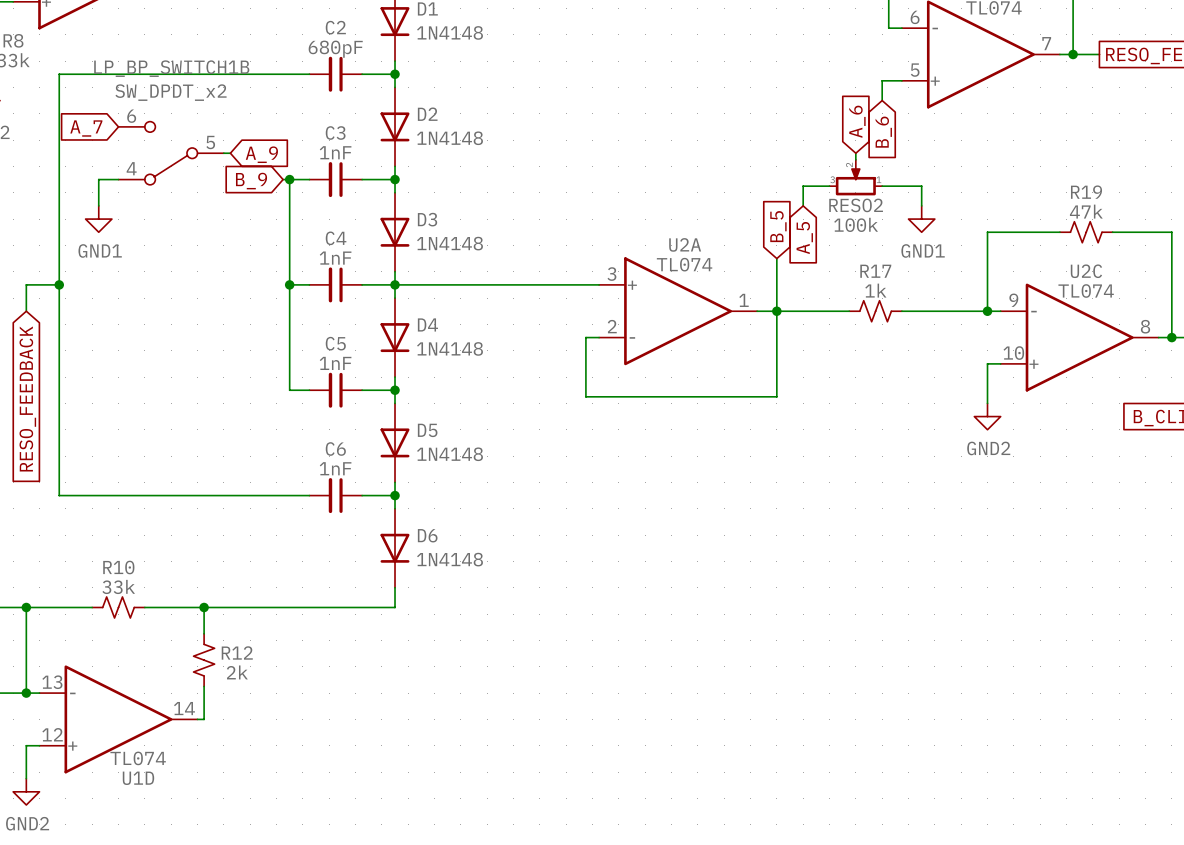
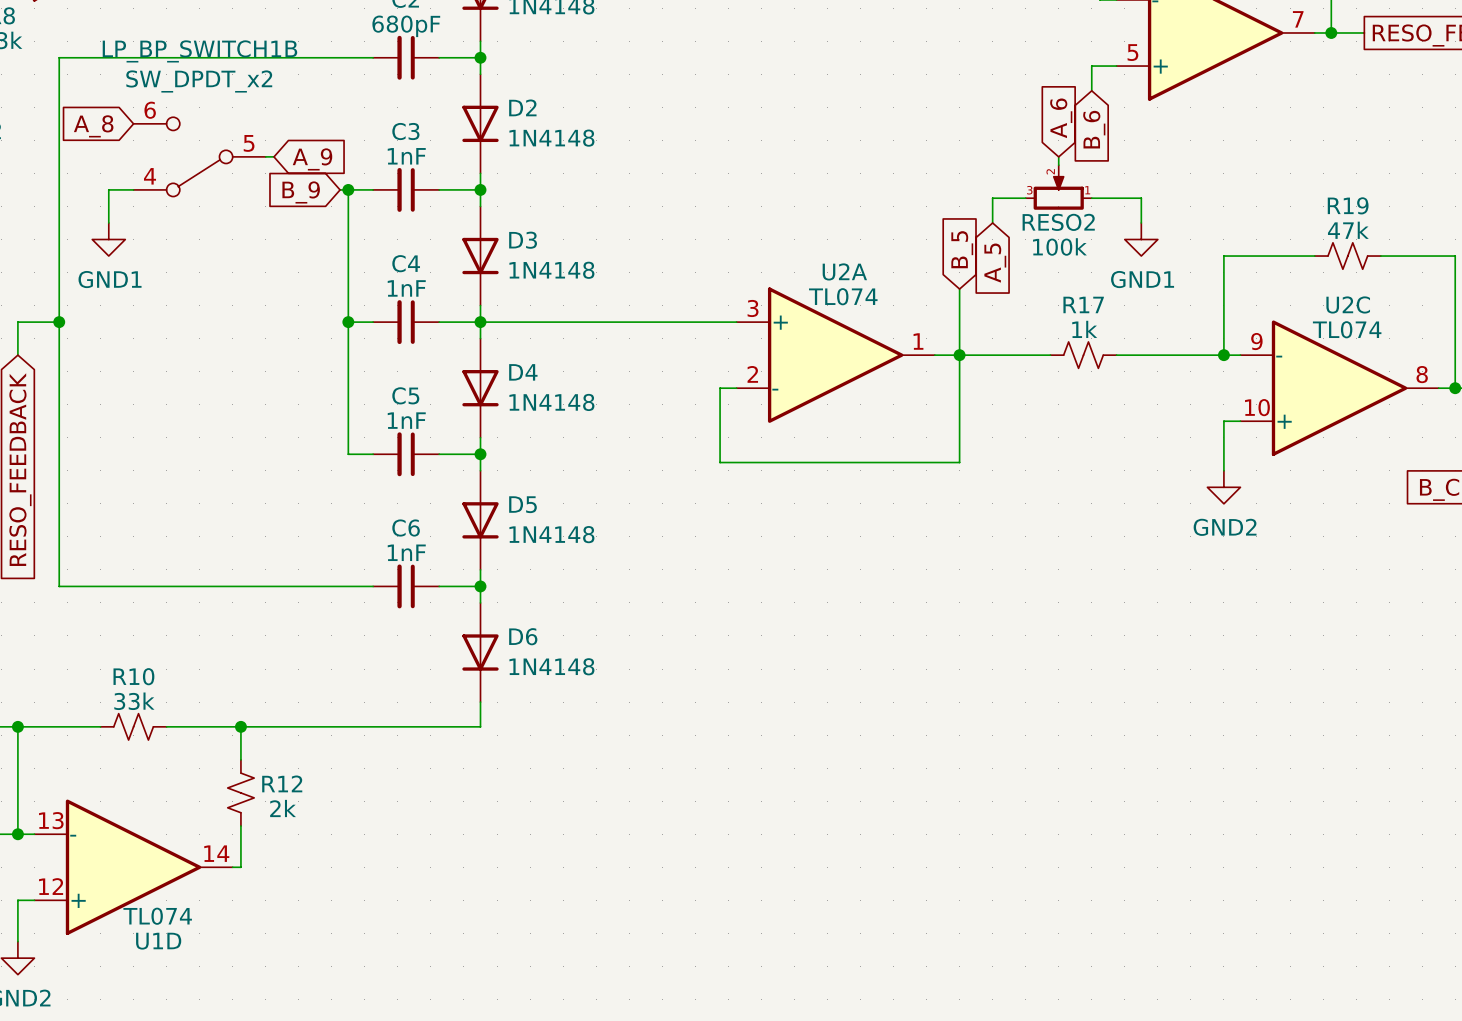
global label: A_7 (86, 128) -> A_8 (93, 126)

